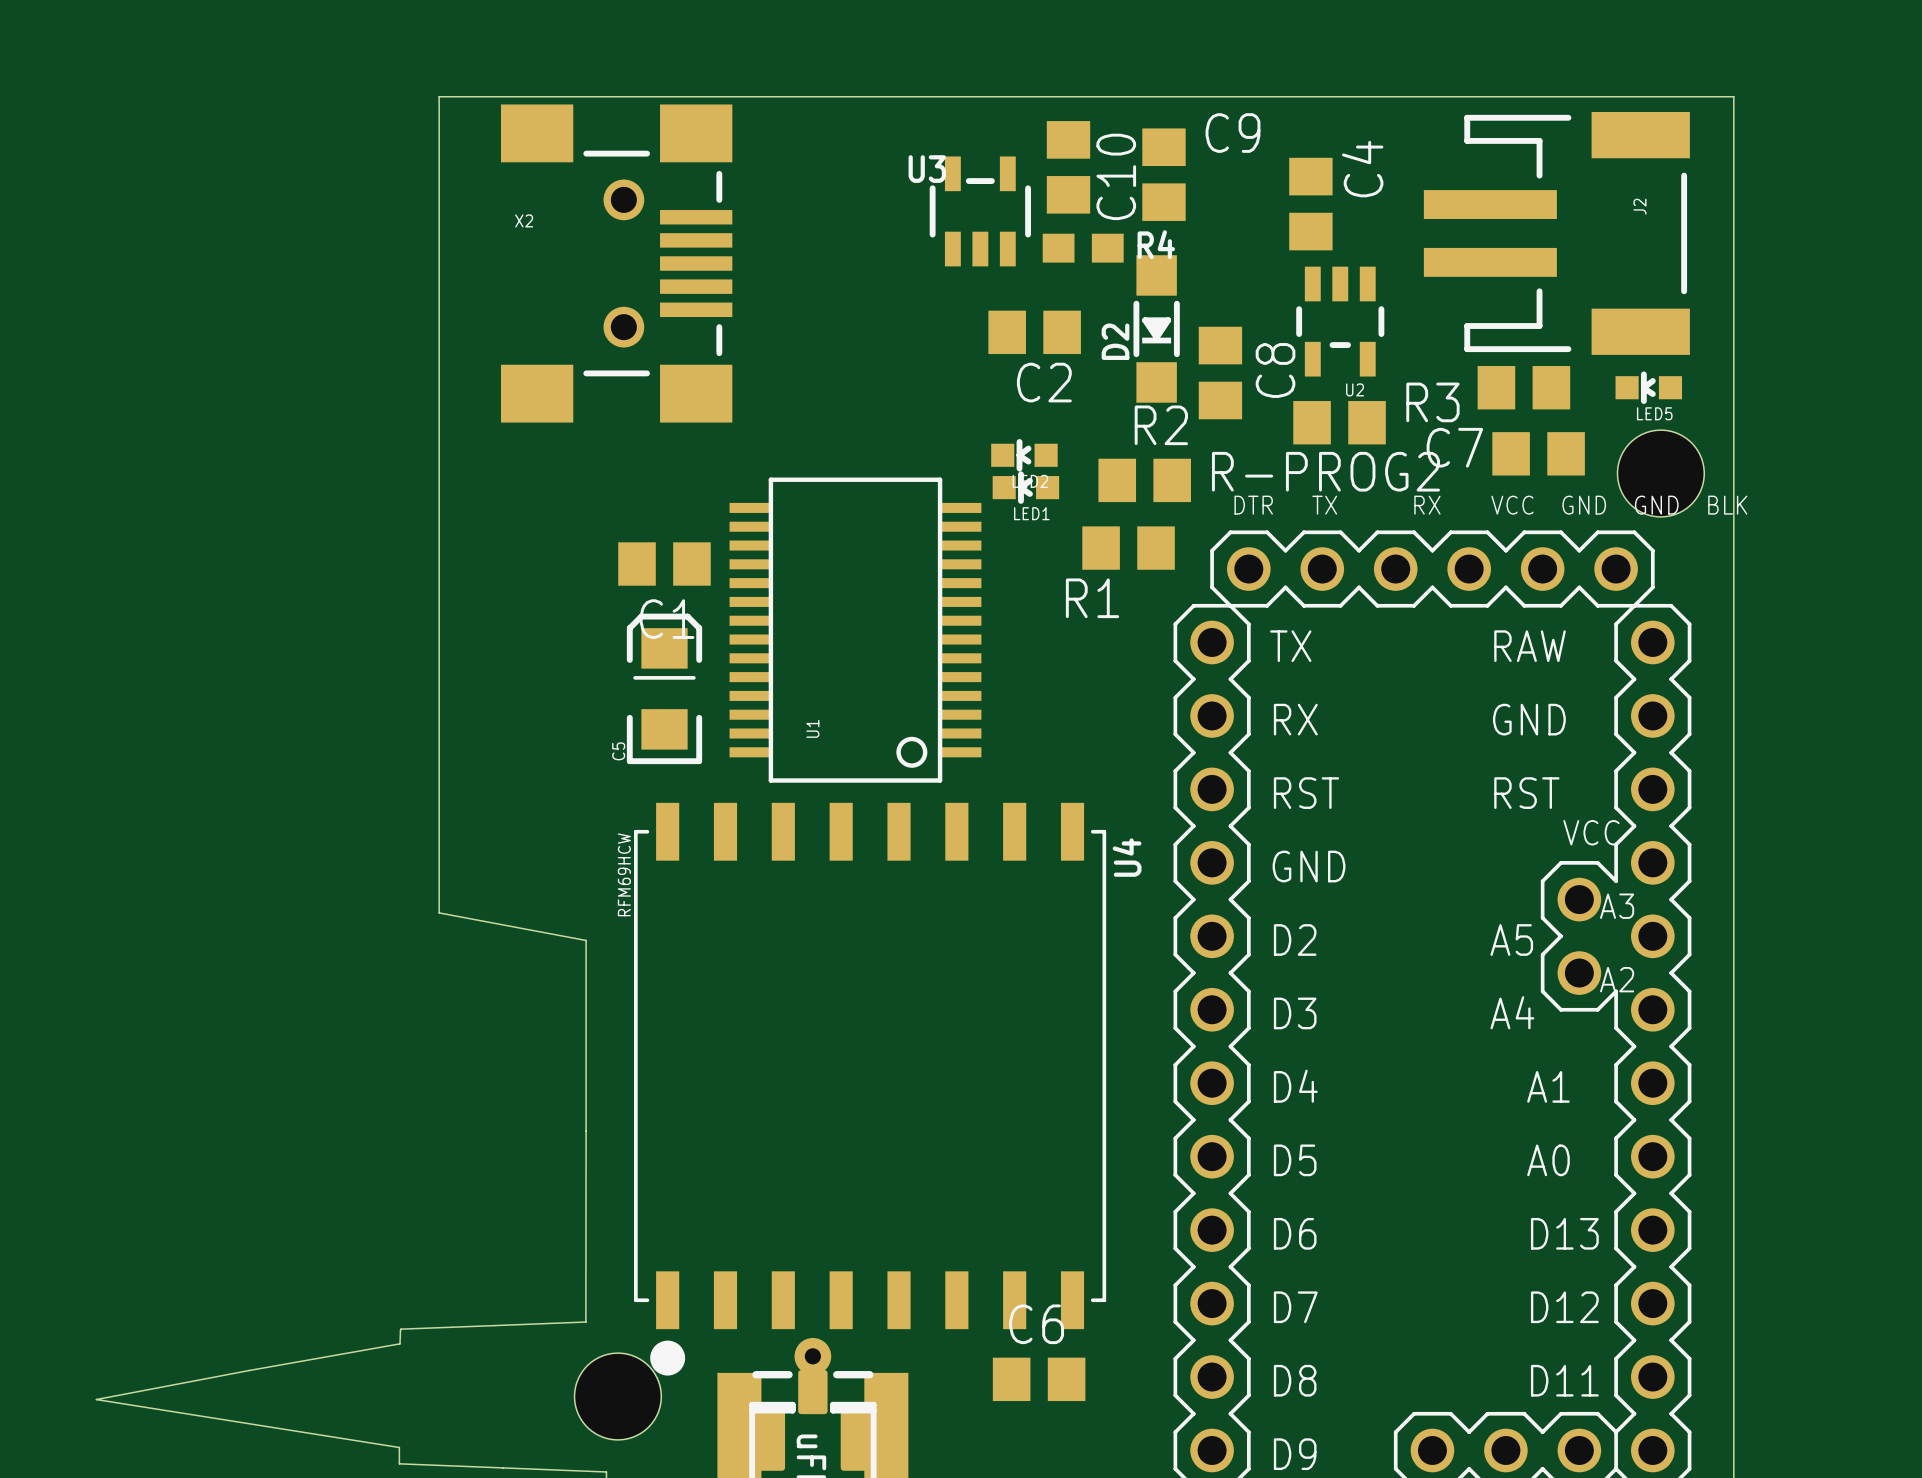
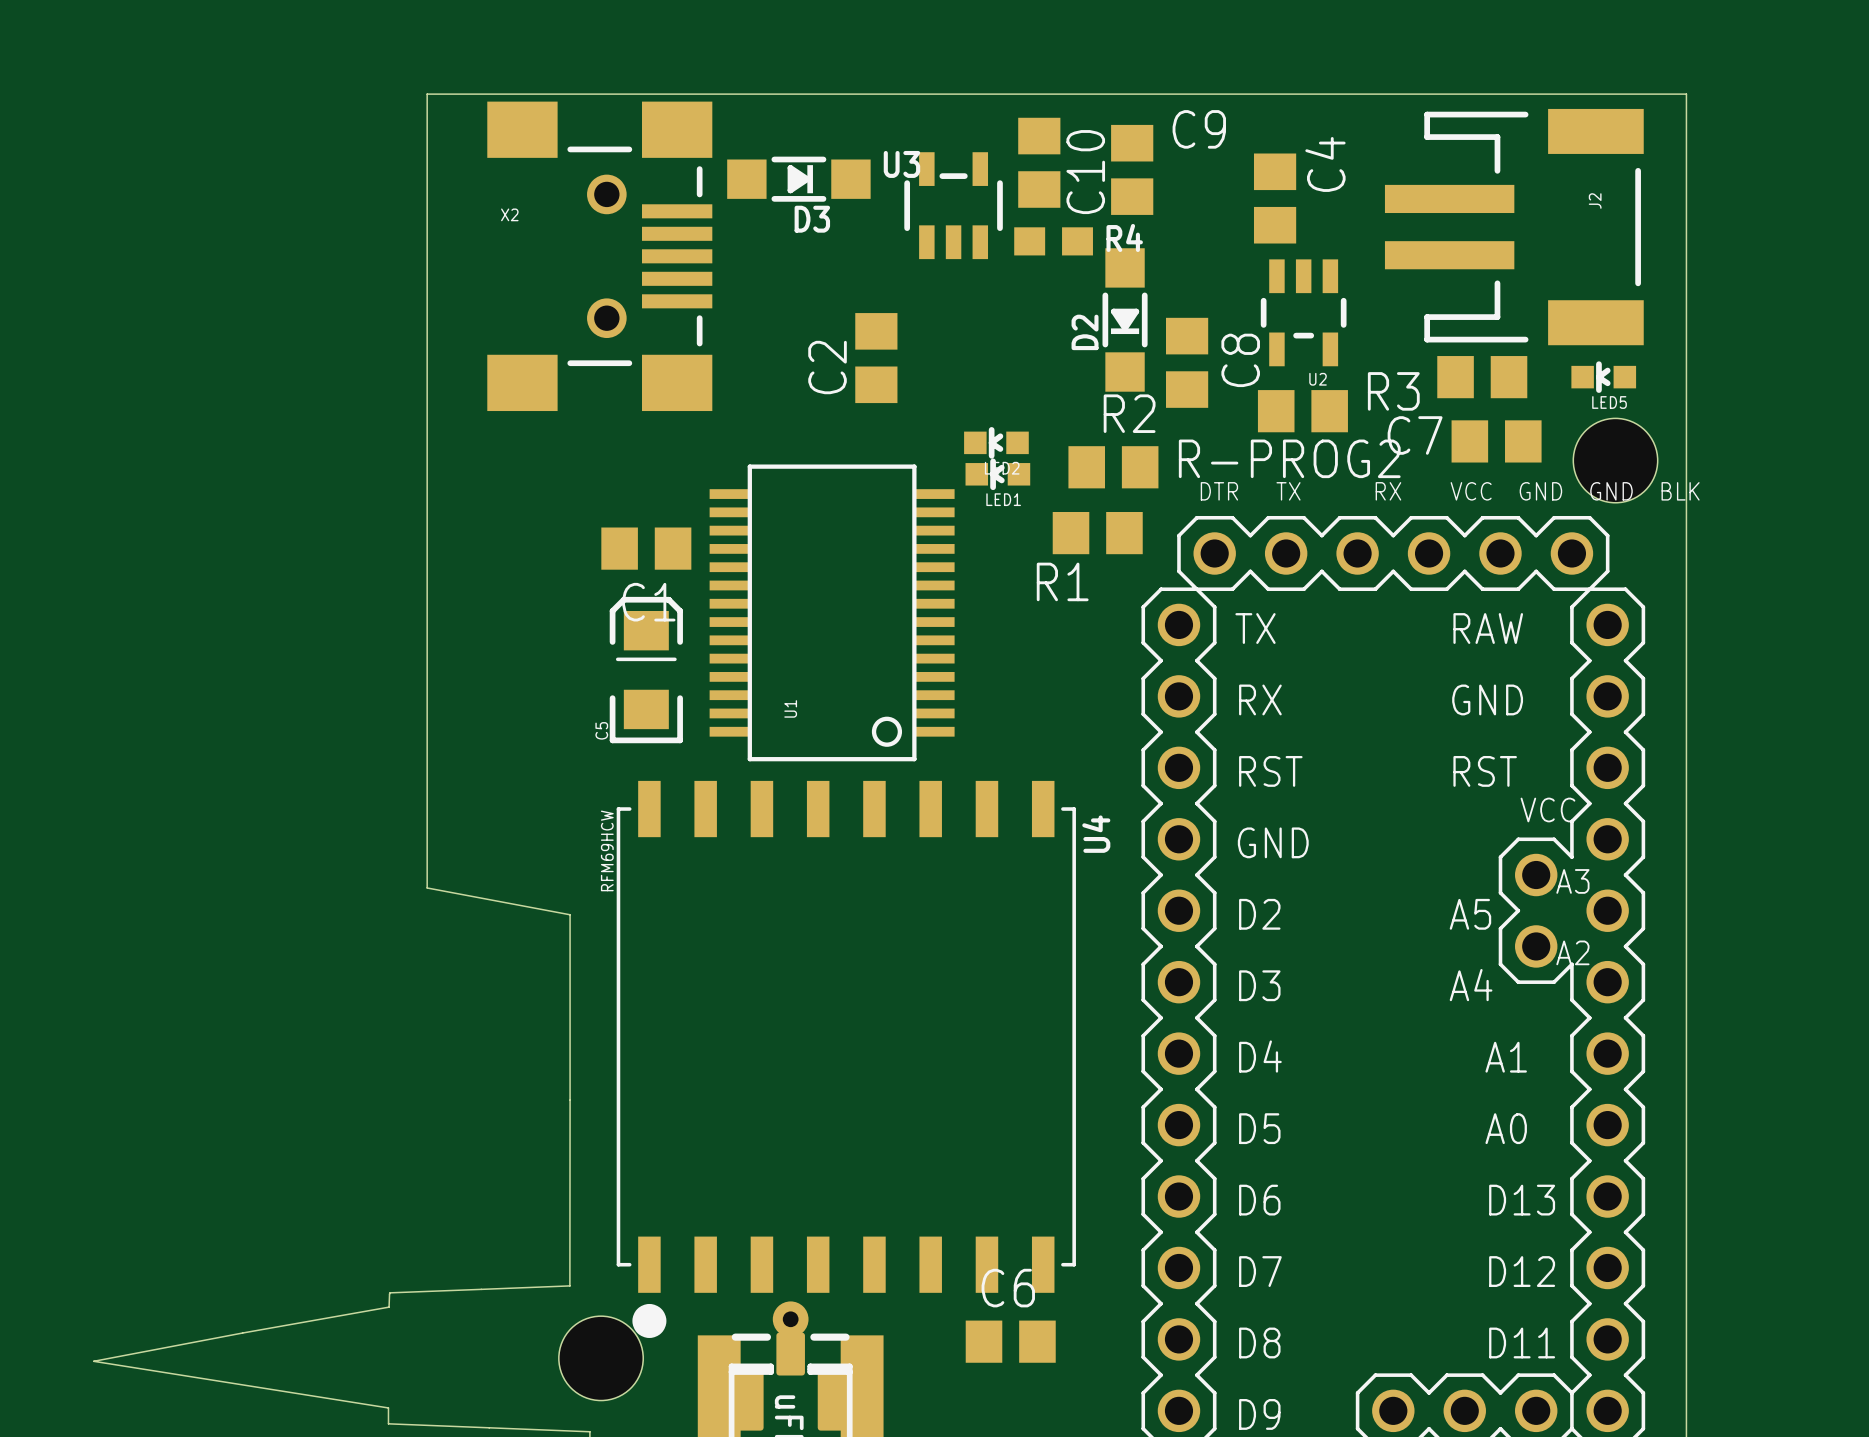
D3: none -> (798, 179)
C2 rotation: 0° (1034, 332) -> 90° clockwise (876, 358)
C2 position: (1034, 332) -> (876, 358)

